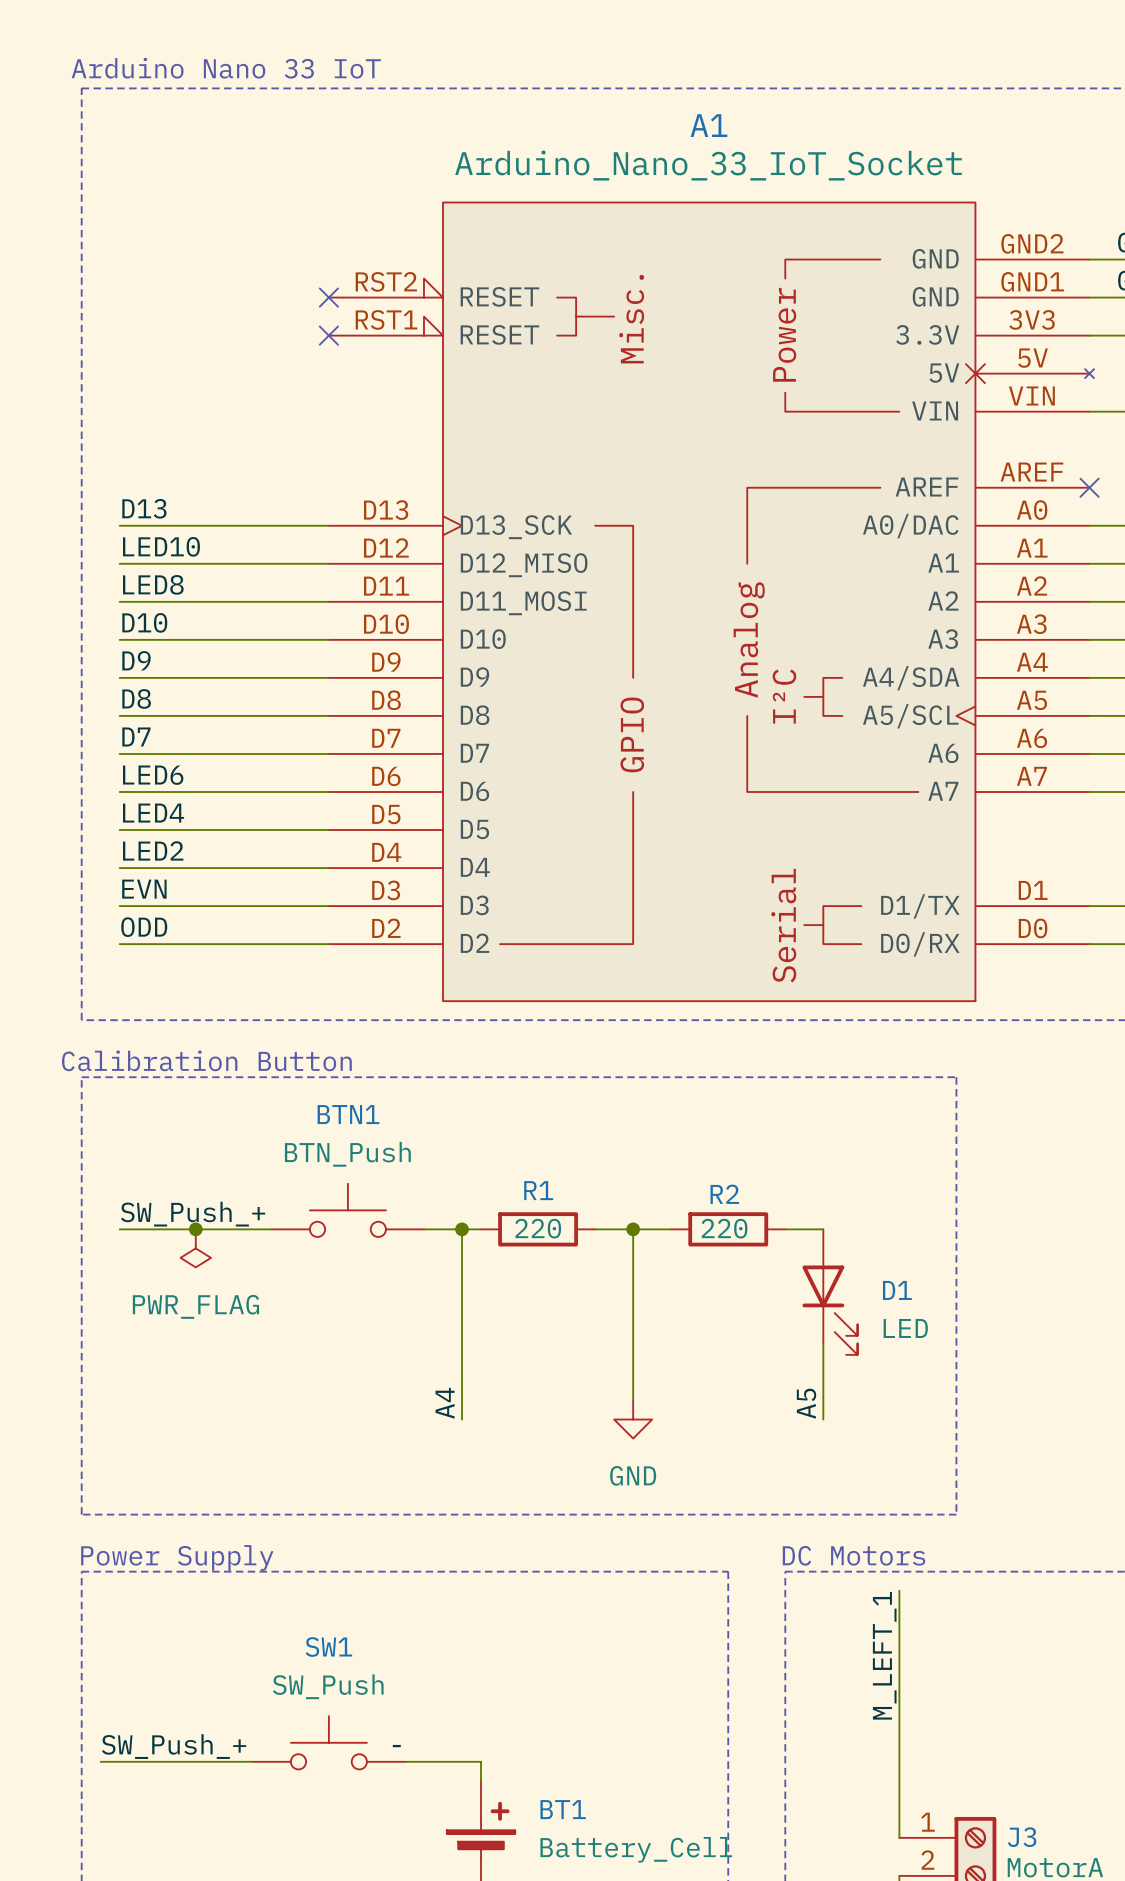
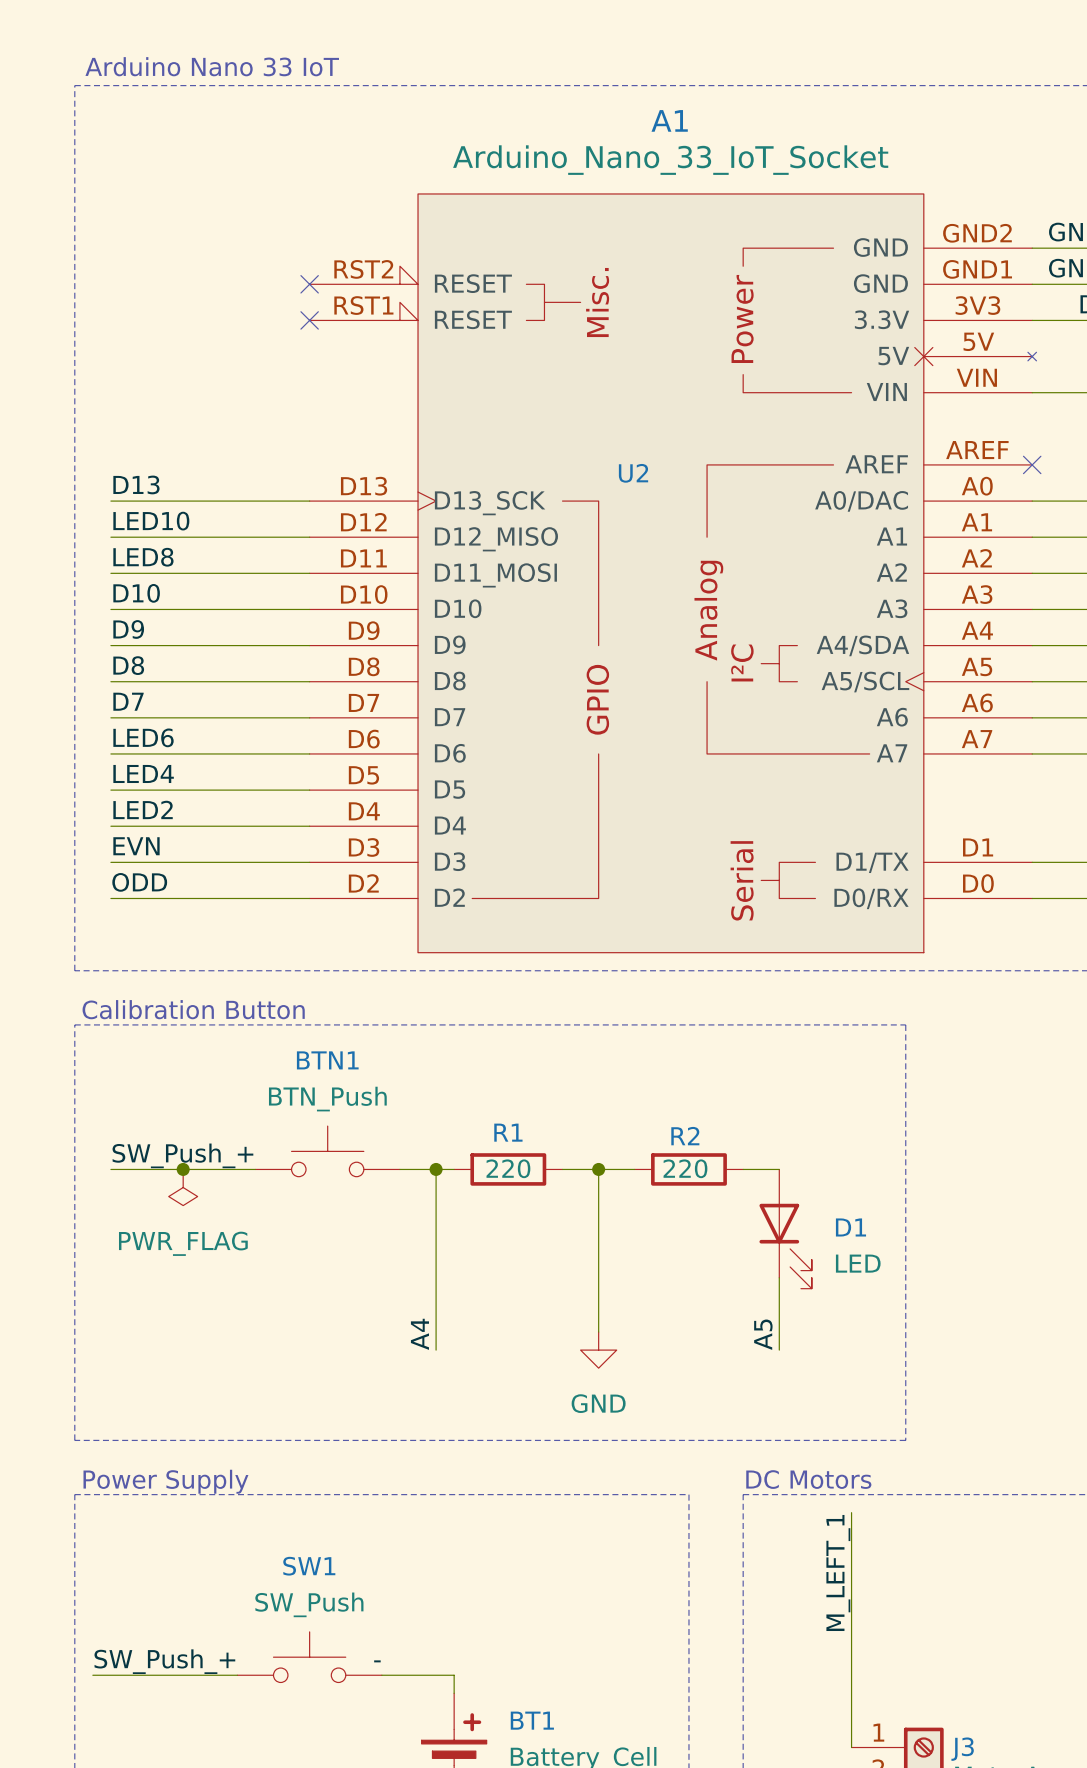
U2: none -> (633, 473)

